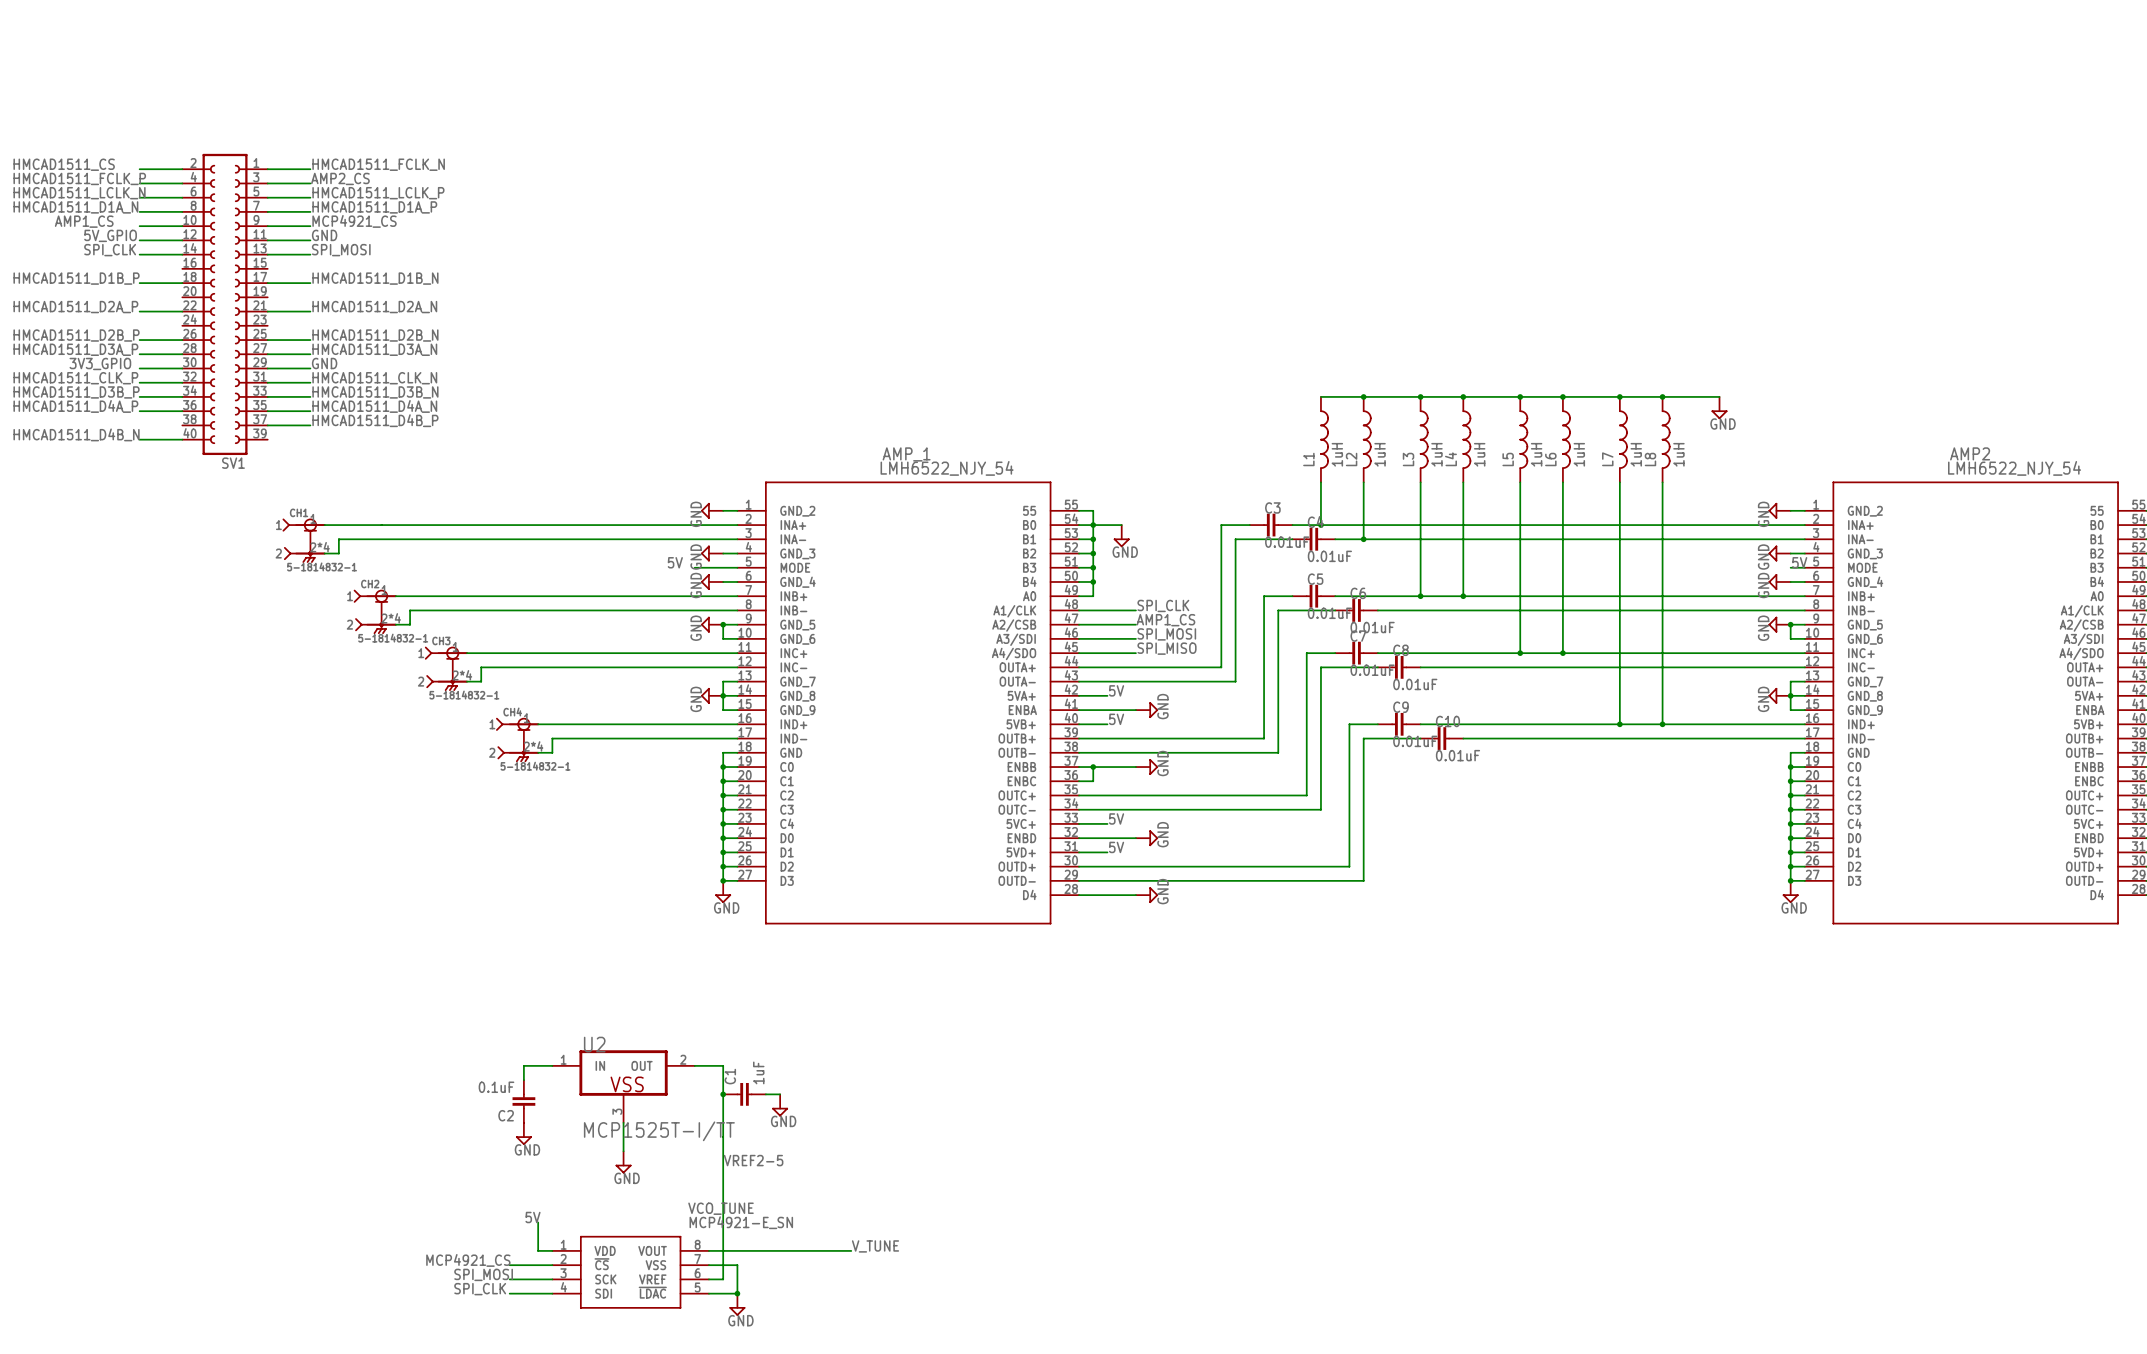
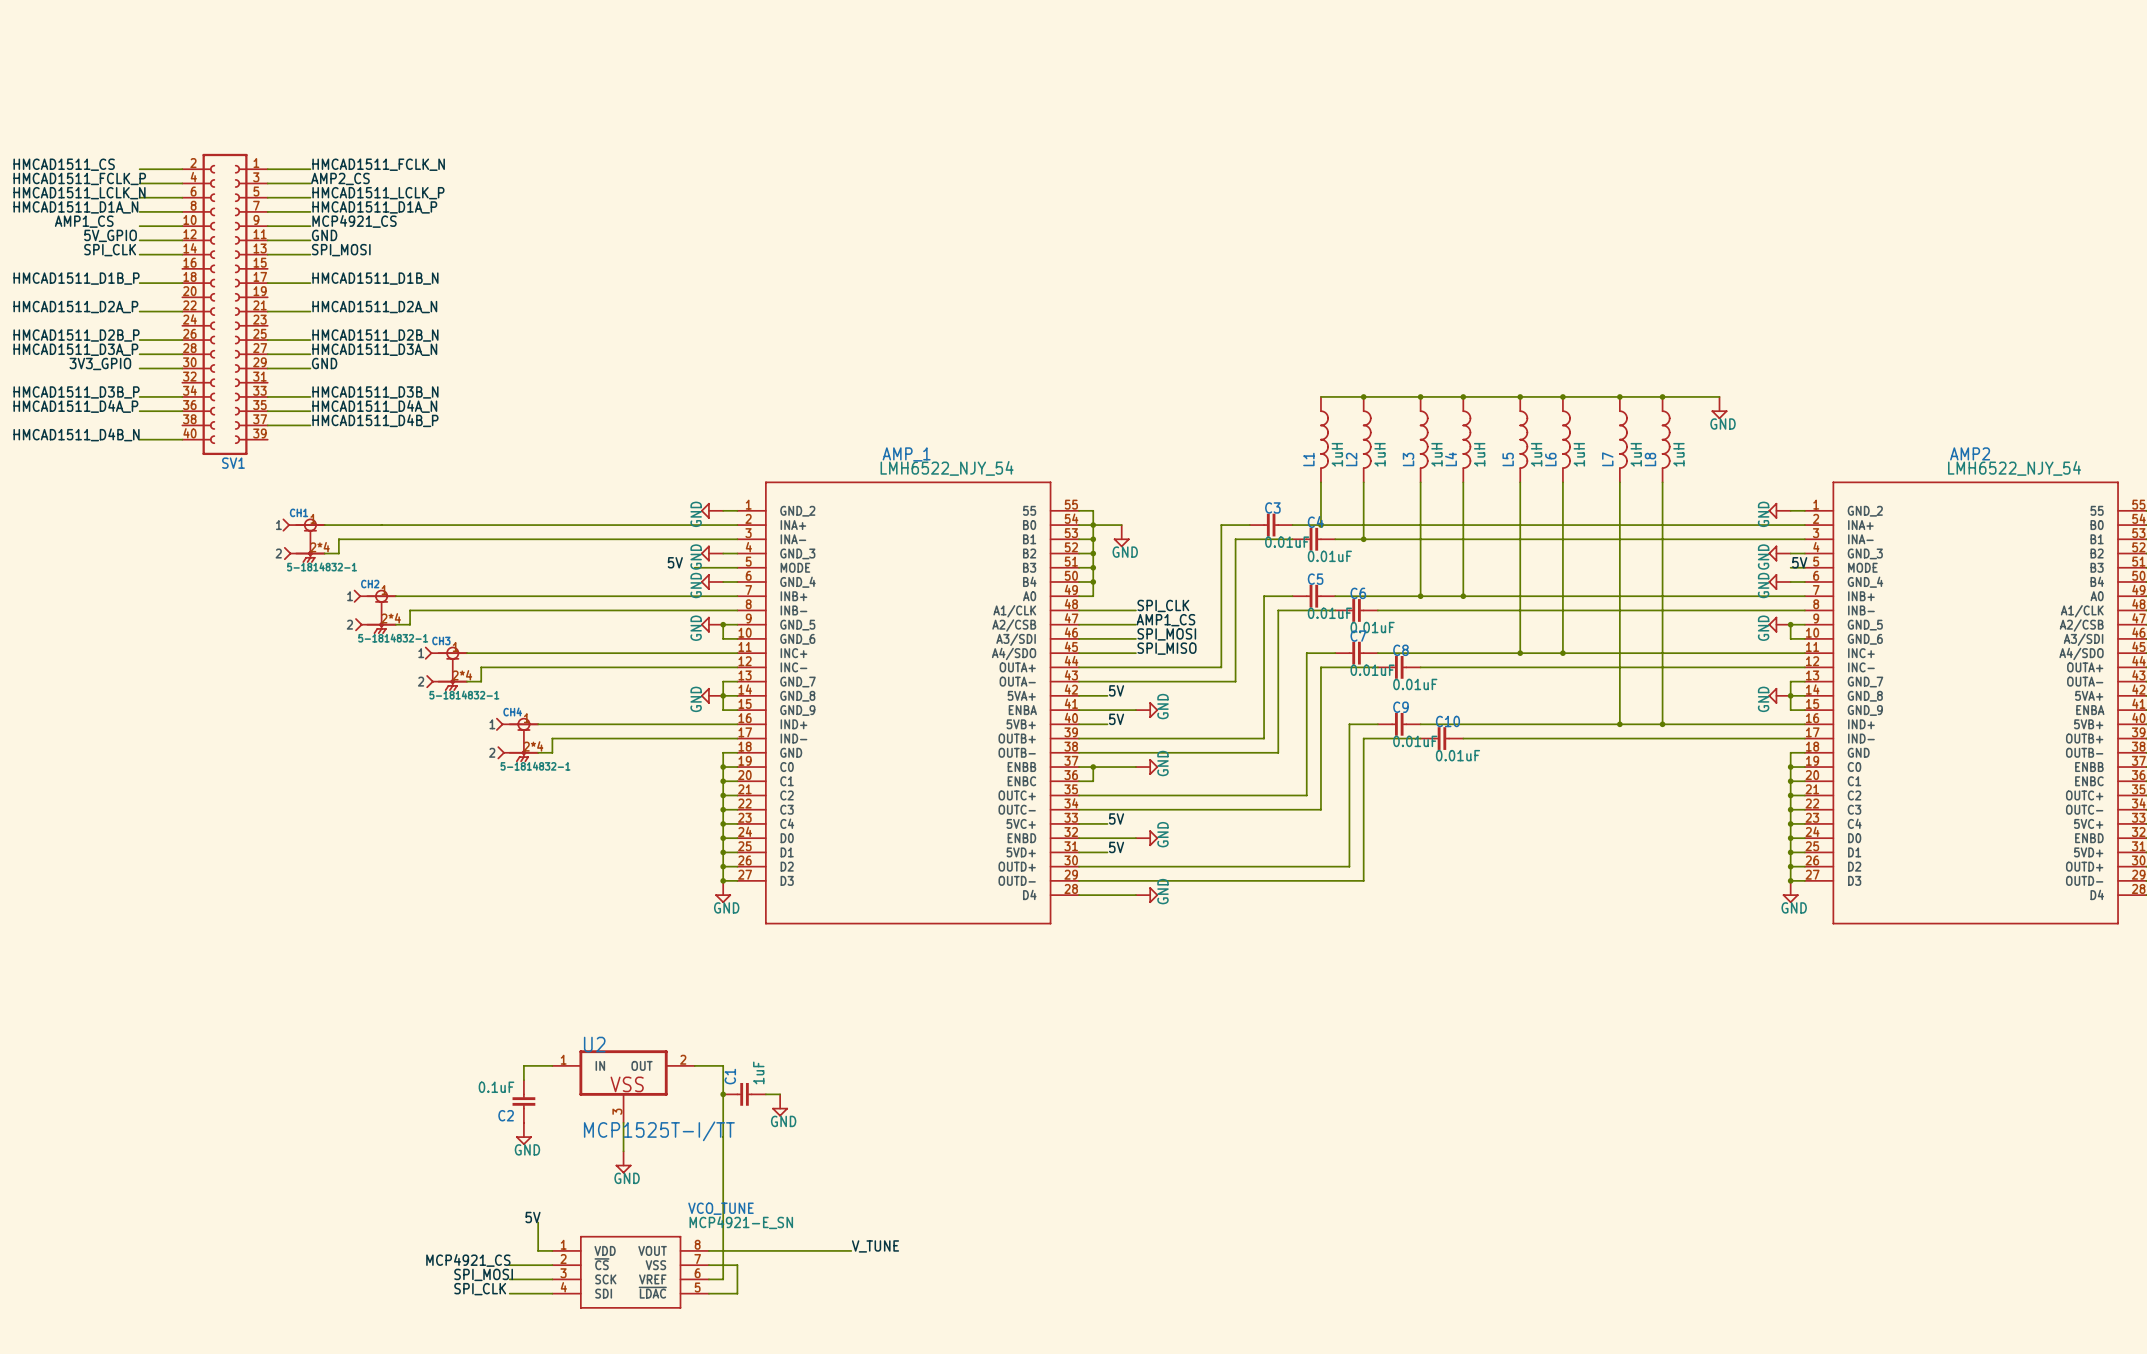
label: HMCAD1511_CLK_P (75, 378) -> none
label: HMCAD1511_CLK_N (374, 378) -> none
wire: (139, 382) (182, 382) -> none
wire: (267, 382) (310, 382) -> none
label: VREF2-5 (753, 1160) -> none
junction: (737, 1293) -> none
power symbol: GND (737, 1304) -> none

